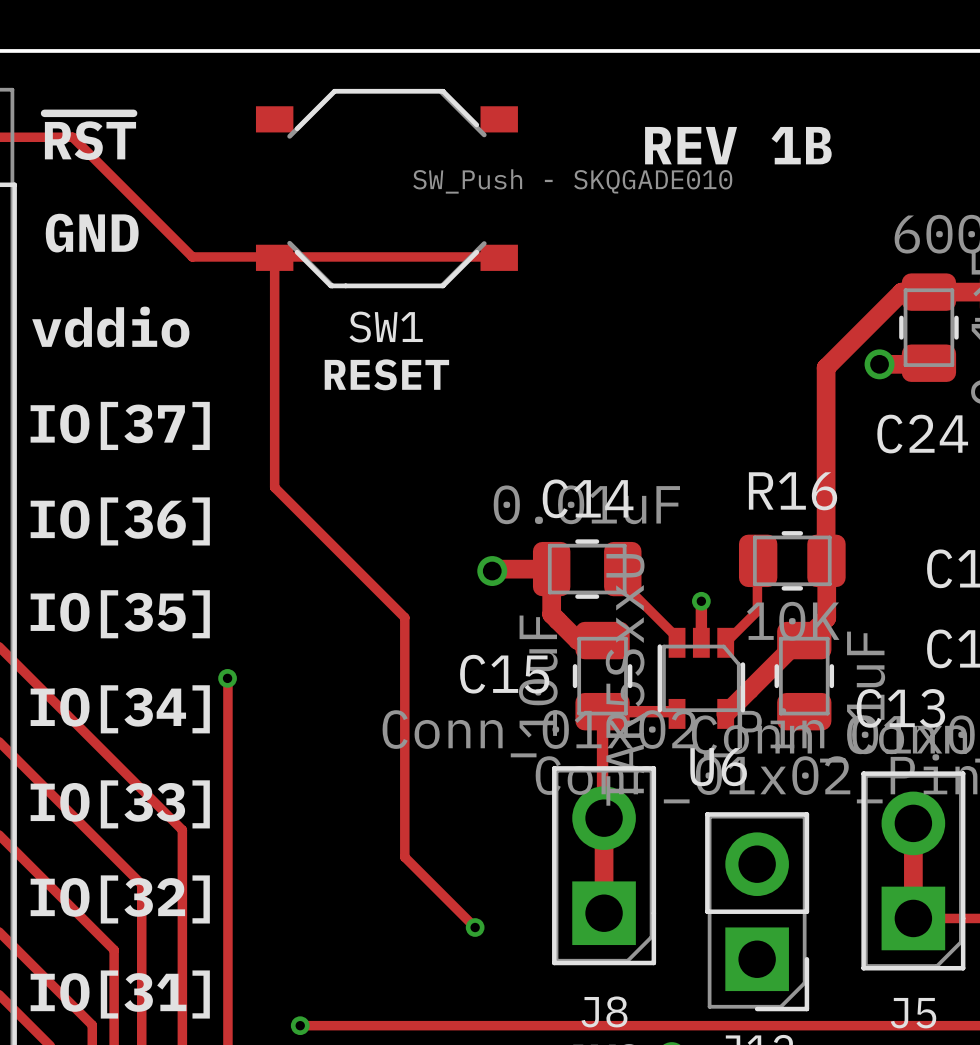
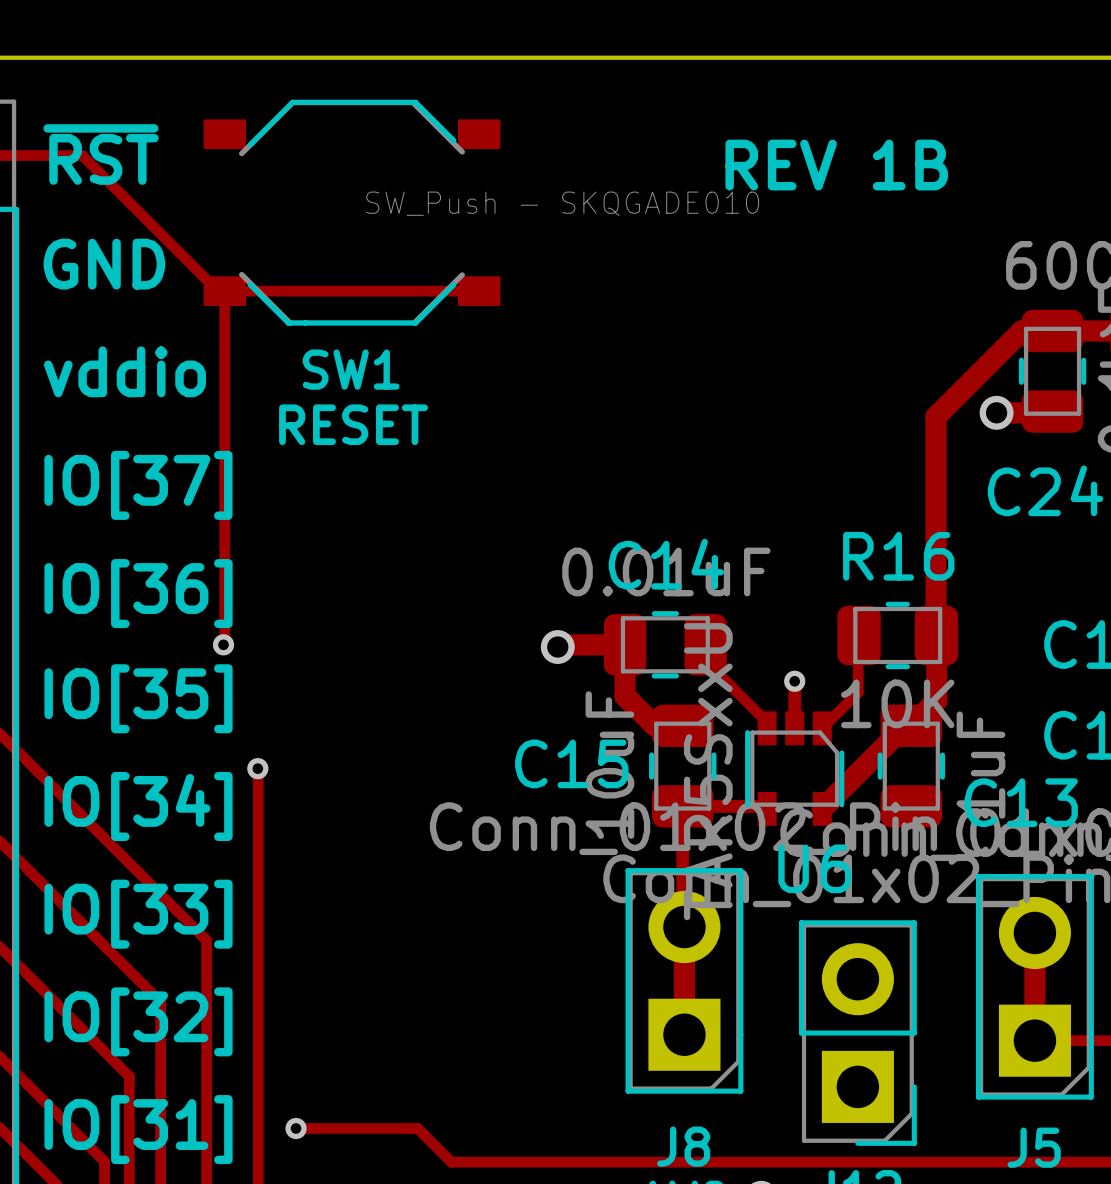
SW1 position: (386, 188) -> (351, 212)
track: none -> (224, 291) (223, 644)
track: (422, 256) (499, 257) -> none
track: (274, 257) (274, 487) (404, 617) (404, 857) (475, 927) -> none
text position: RESET (386, 374) -> RESET (353, 424)
via: none -> (223, 644)
via: (475, 927) -> none
via: none -> (296, 1128)
track: (300, 1025) (398, 1025) -> (296, 1128) (417, 1128) (451, 1162)
via: (300, 1025) -> none

